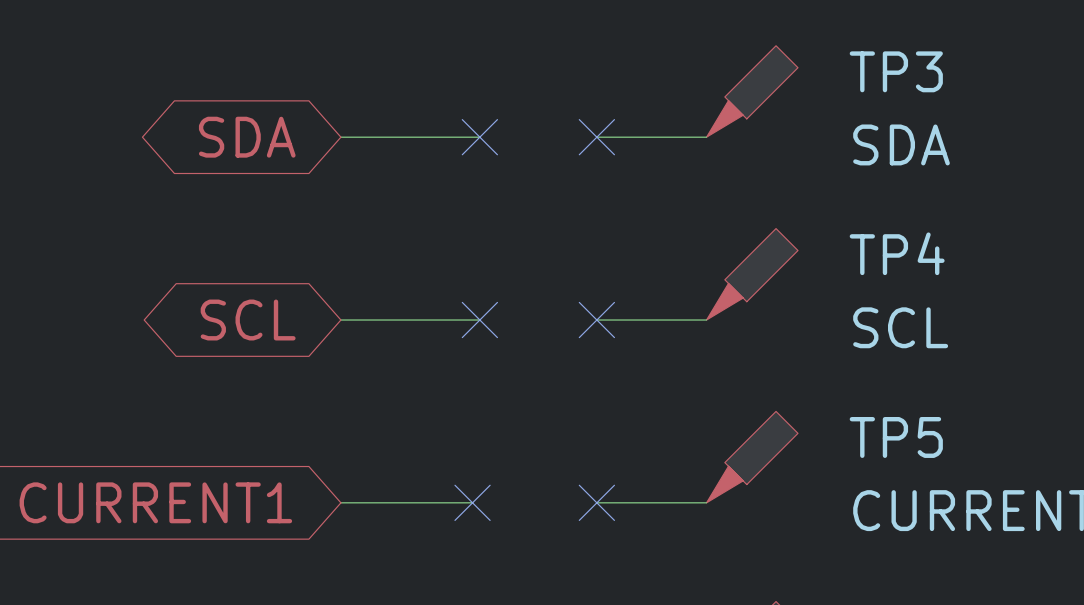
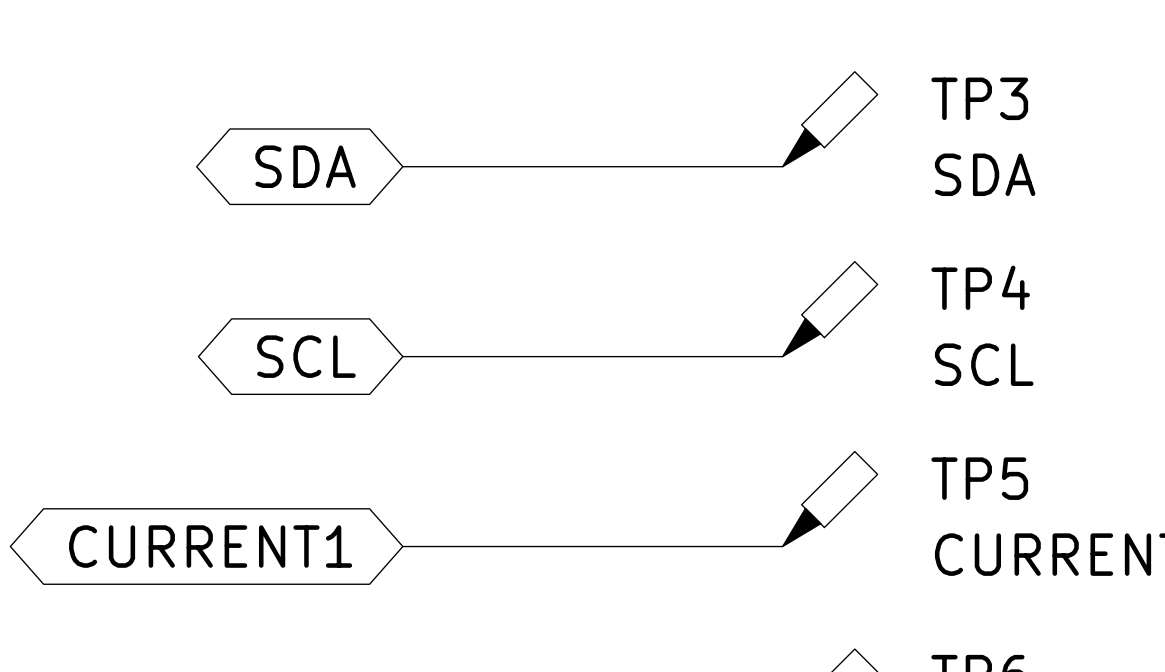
wire: none -> (547, 166) (668, 166)
no-connect mark: (479, 137) -> none
no-connect mark: (596, 137) -> none
wire: none -> (547, 356) (668, 356)
no-connect mark: (479, 320) -> none
no-connect mark: (596, 320) -> none
wire: none -> (539, 546) (668, 546)
no-connect mark: (472, 502) -> none
no-connect mark: (596, 502) -> none

